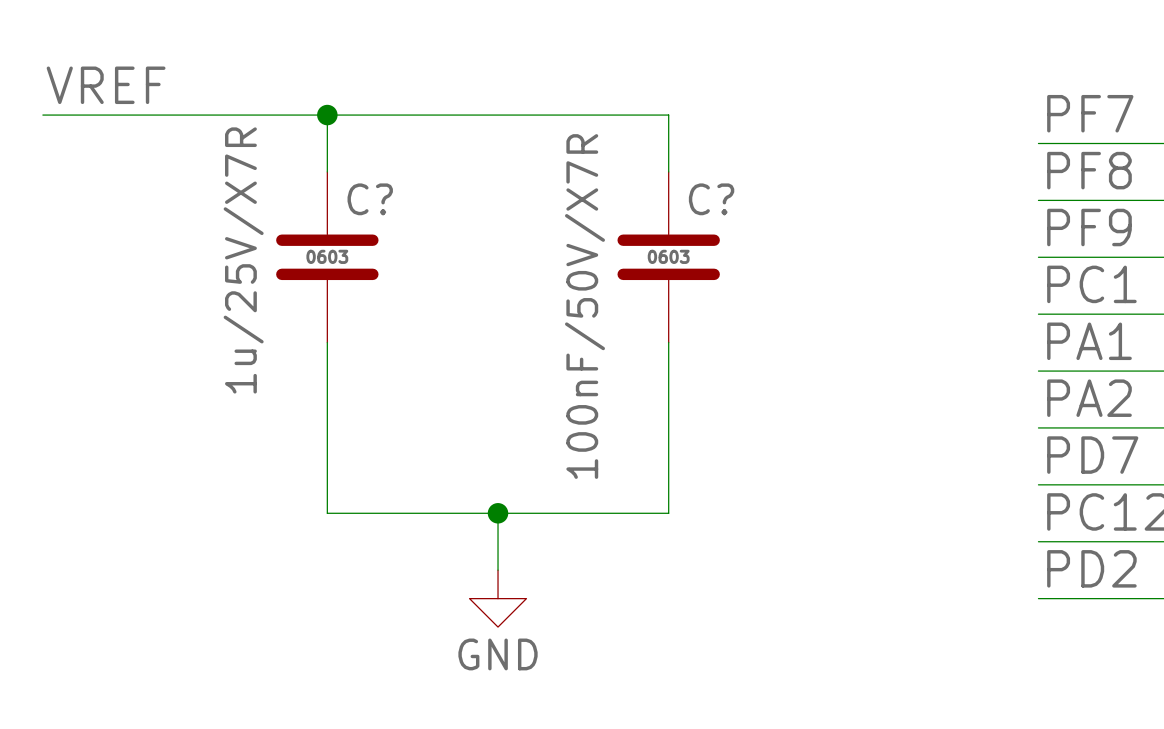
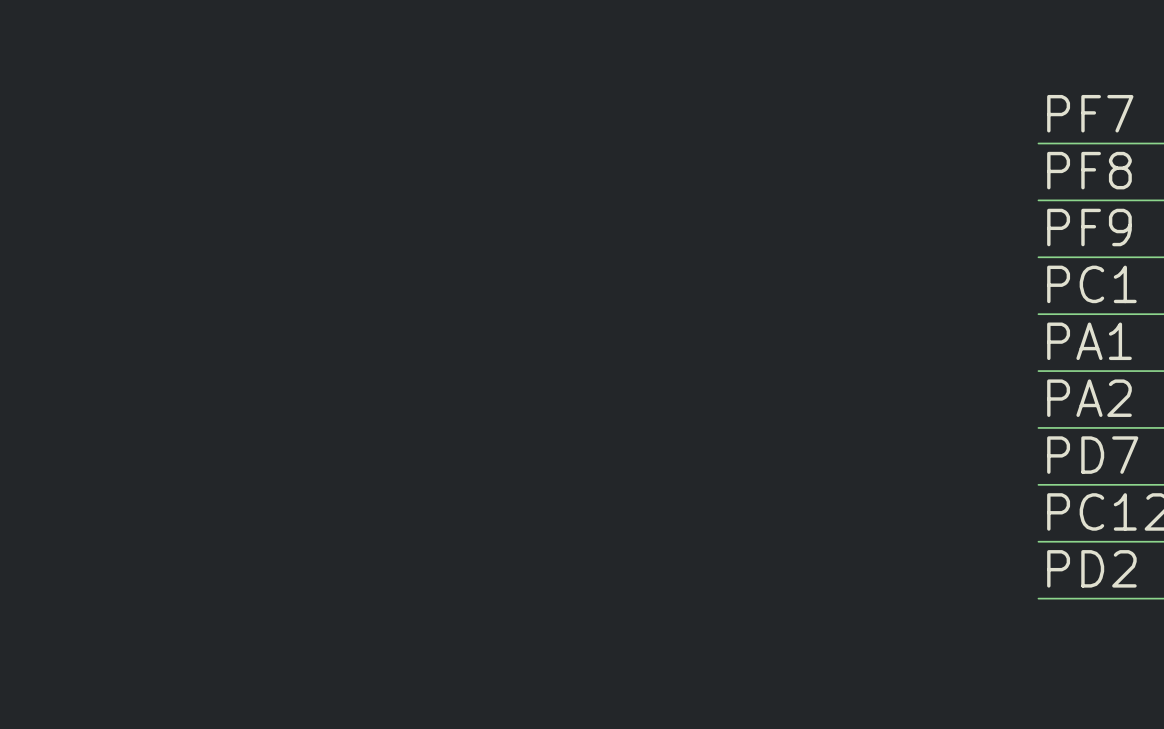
label: VREF (106, 85) -> none
wire: (42, 115) (668, 115) (668, 171) -> none
wire: (327, 115) (327, 171) -> none
junction: (327, 115) -> none
C?: 1u/25V/X7R (327, 257) -> none
C?: 100nF/50V/X7R (668, 257) -> none
wire: (327, 342) (327, 513) (668, 513) (668, 342) -> none
wire: (498, 513) (498, 570) -> none
junction: (498, 513) -> none
power symbol: GND (498, 598) -> none

